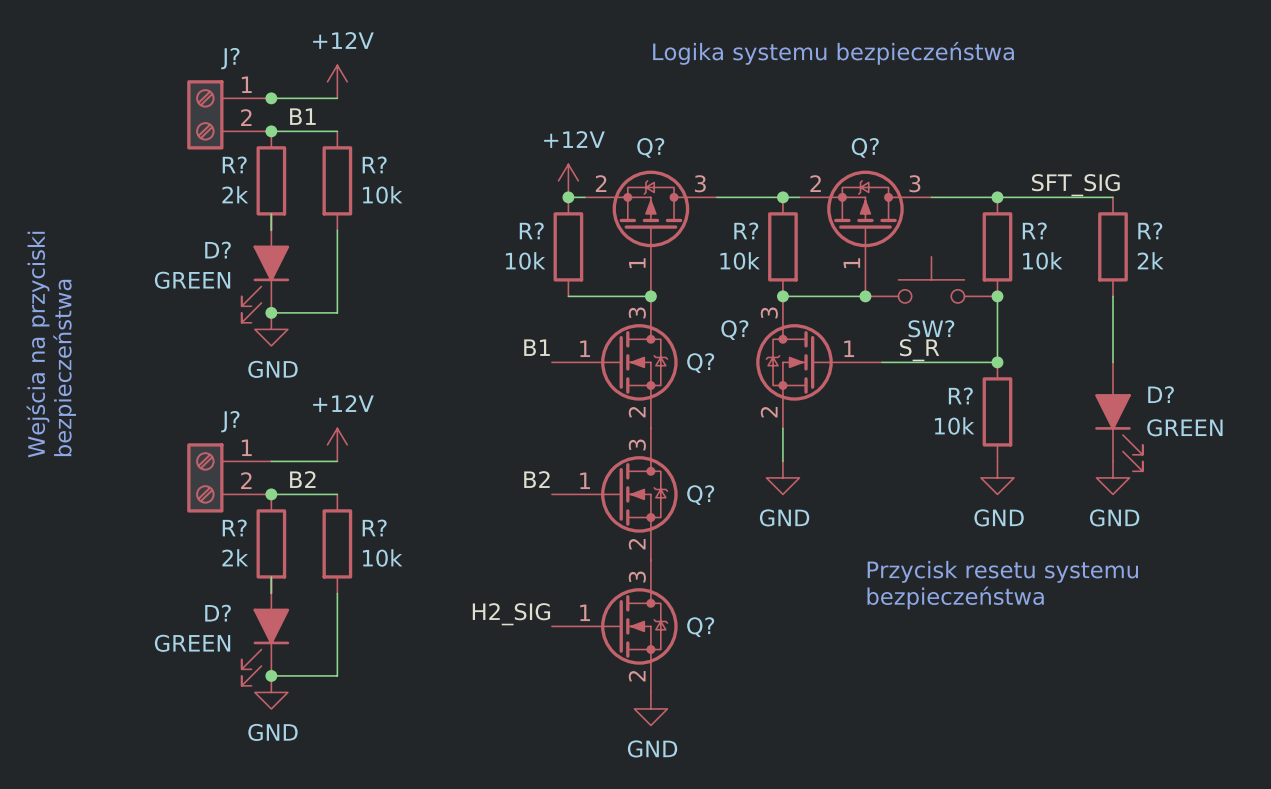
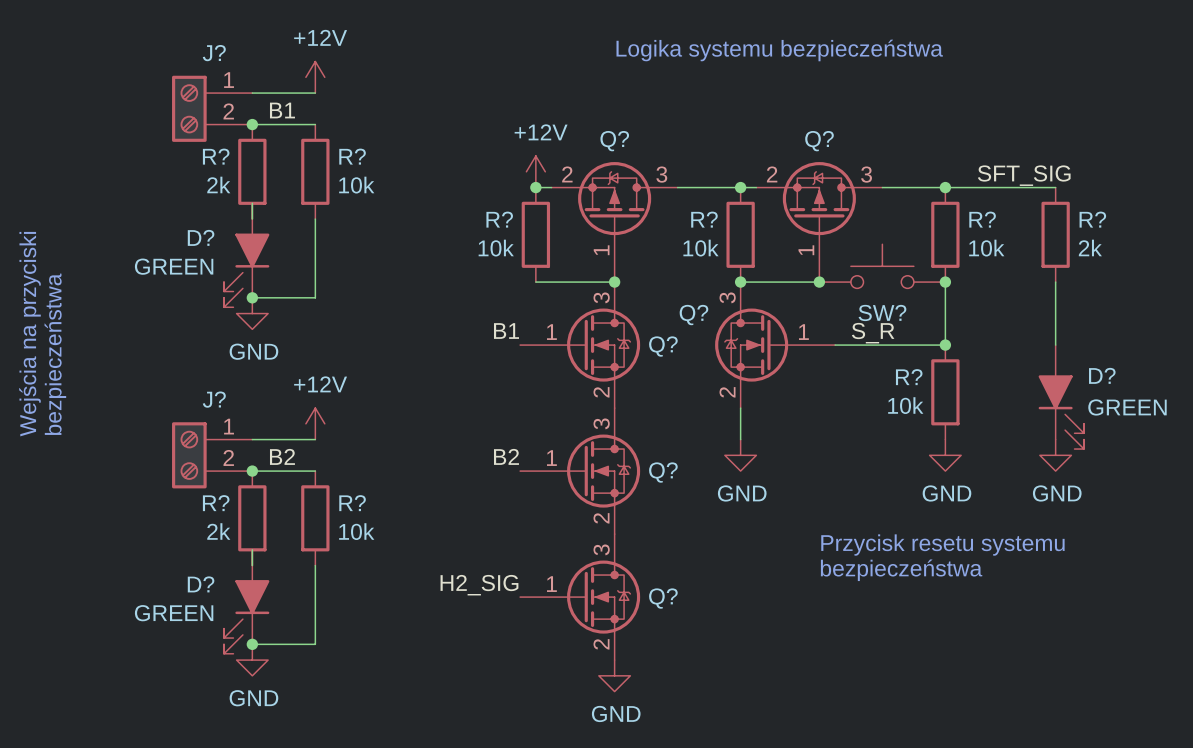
junction: (271, 98) -> none

